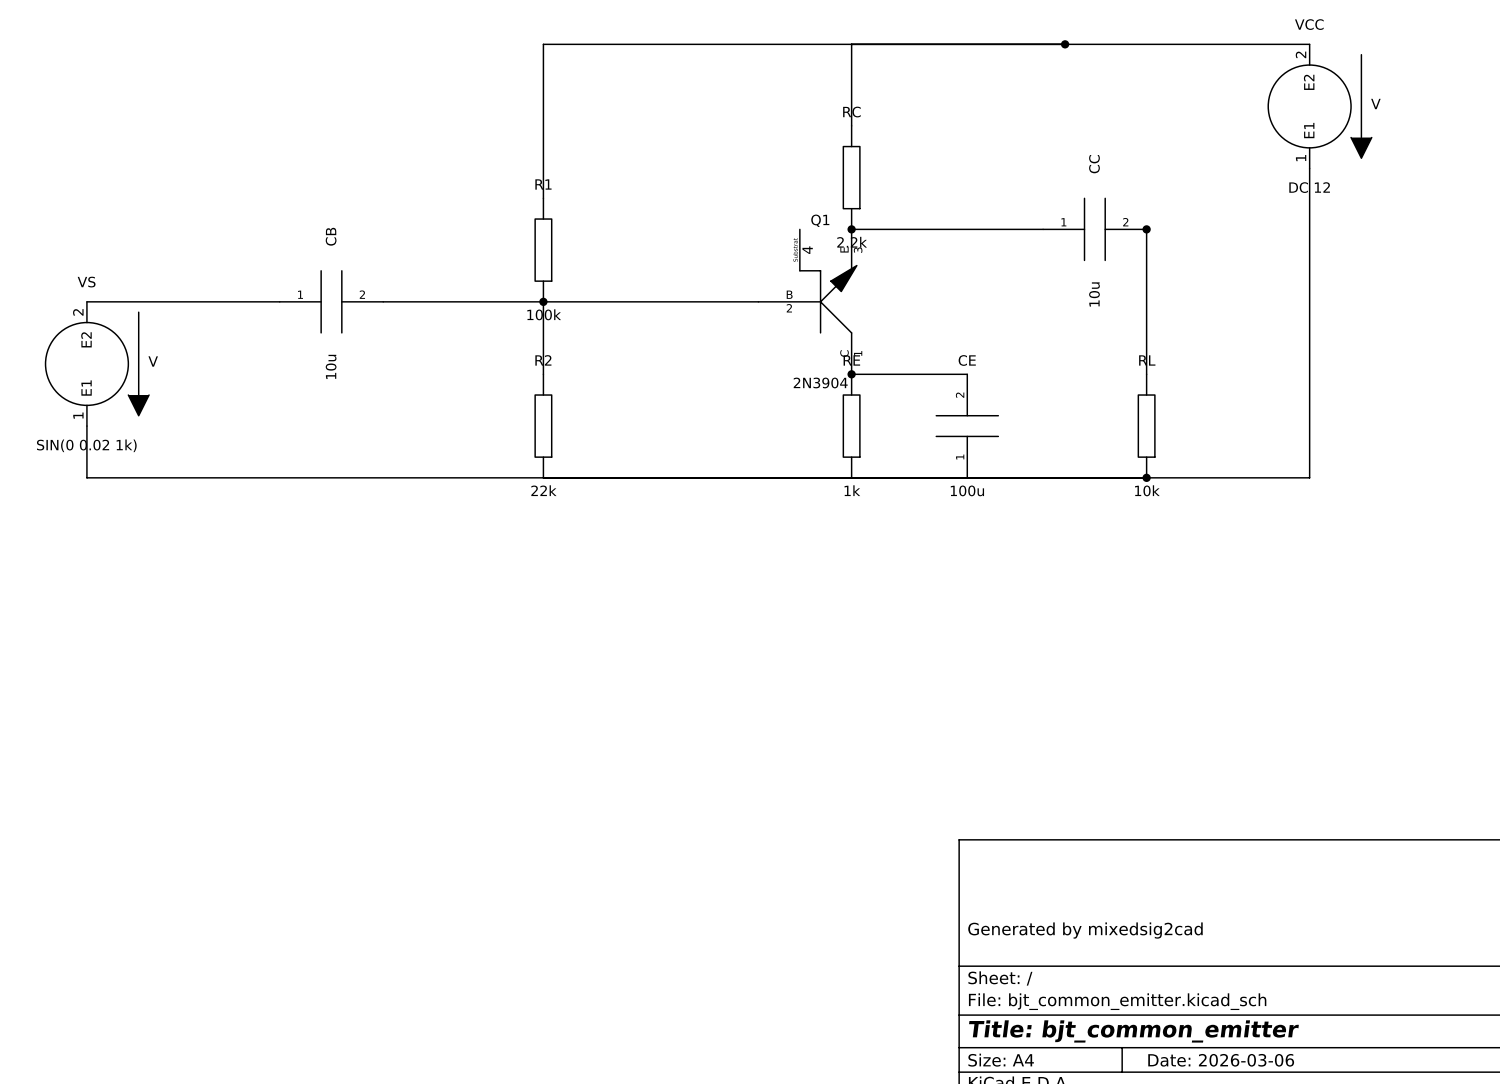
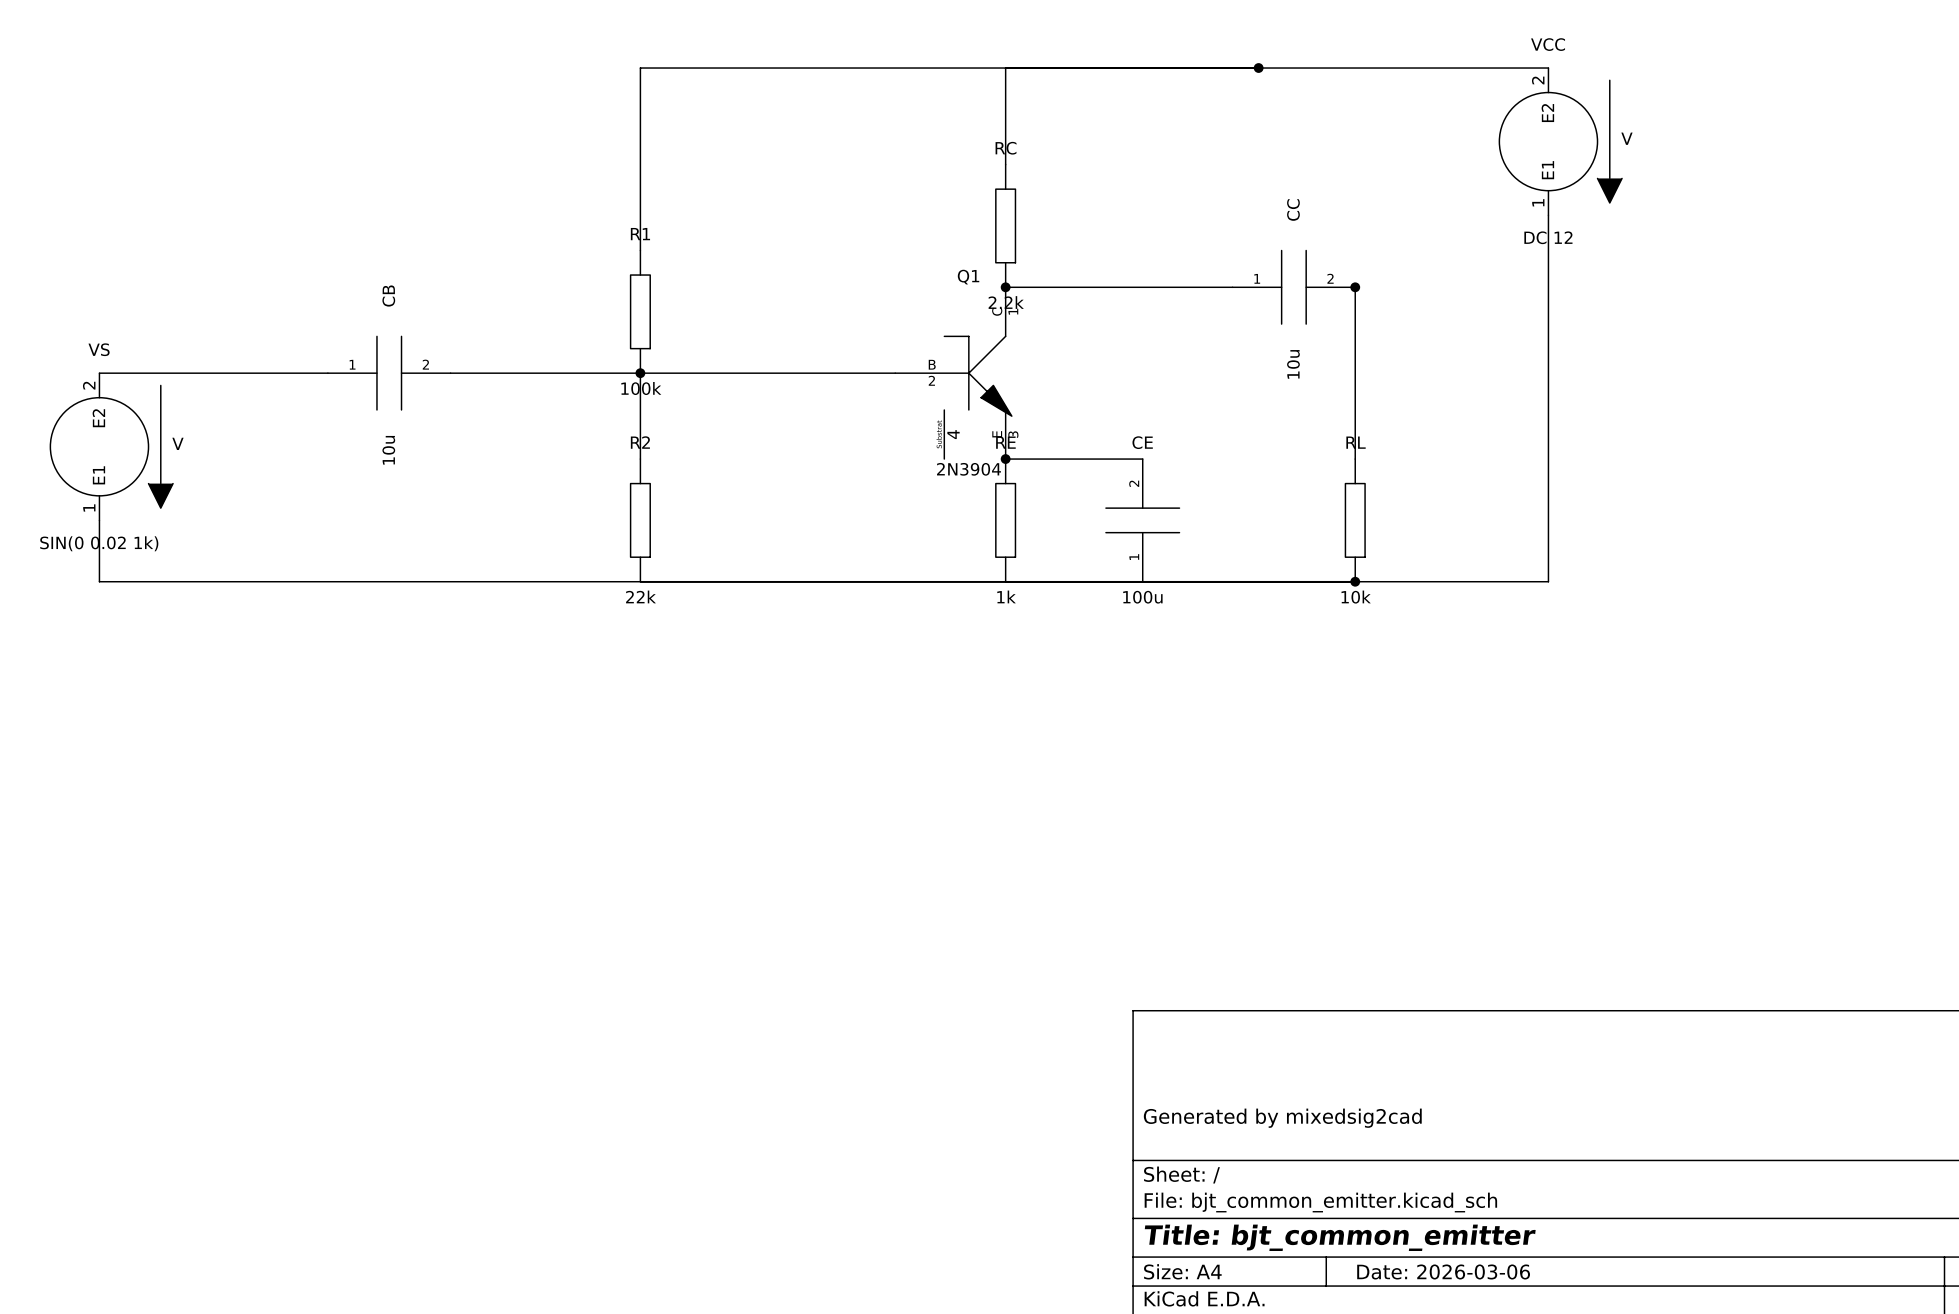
Q1 symbol: [758, 229, 857, 375] -> [895, 287, 1012, 460]

